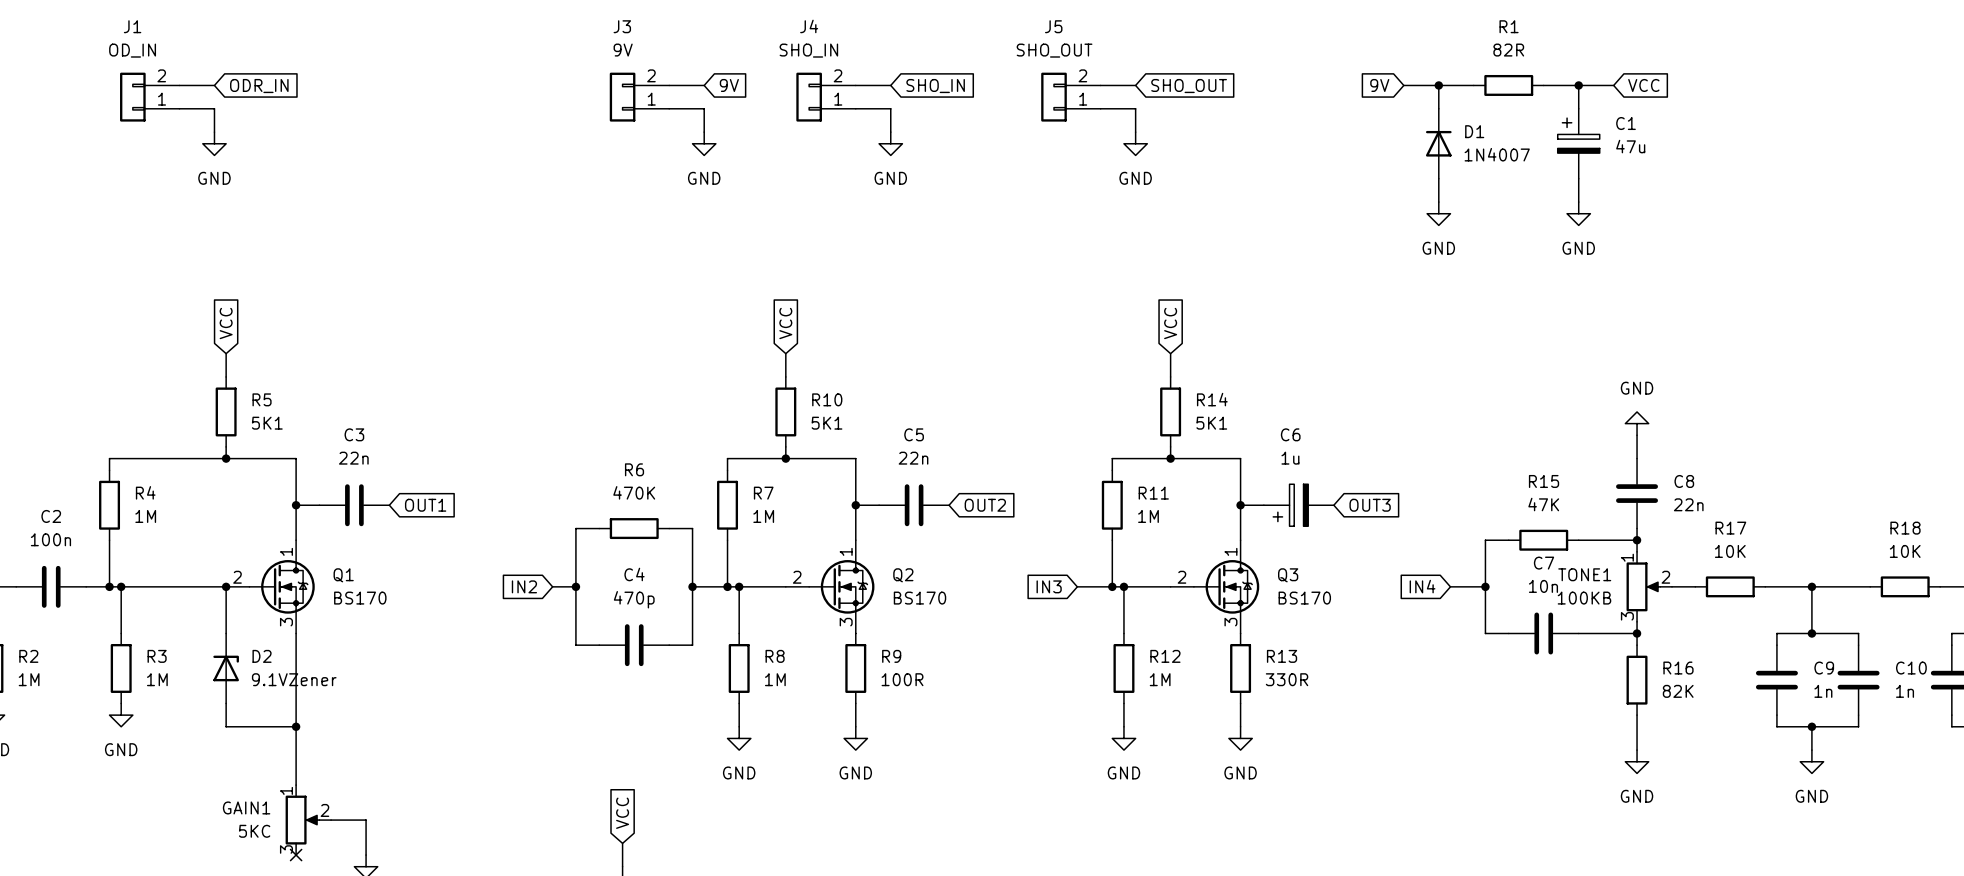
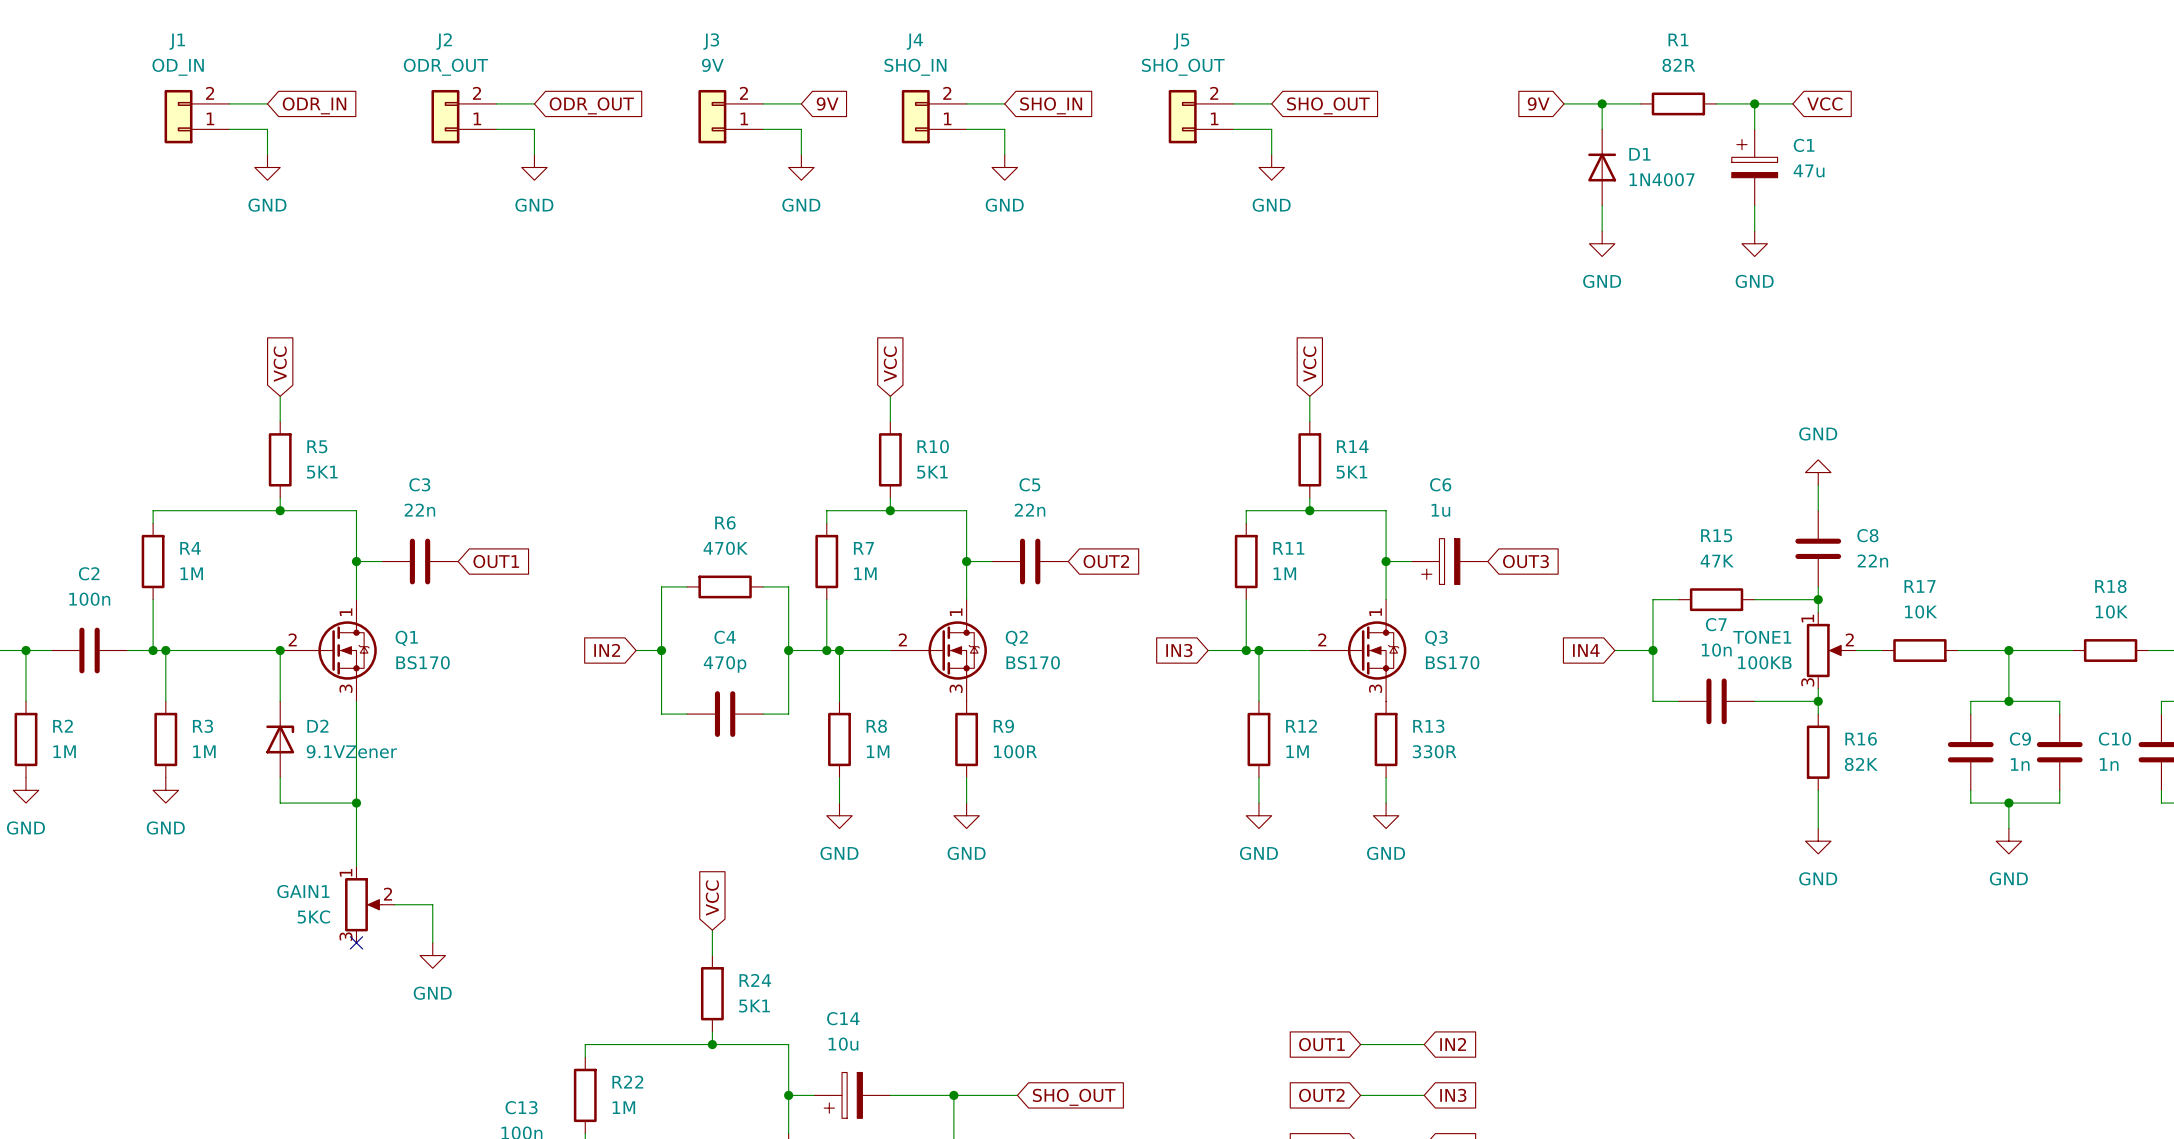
wire: none -> (496, 103) (534, 103)
global label: none -> ODR_OUT (591, 105)
J2: none -> ODR_OUT (463, 116)
wire: none -> (496, 129) (534, 129) (534, 154)
power symbol: none -> GND (534, 167)

